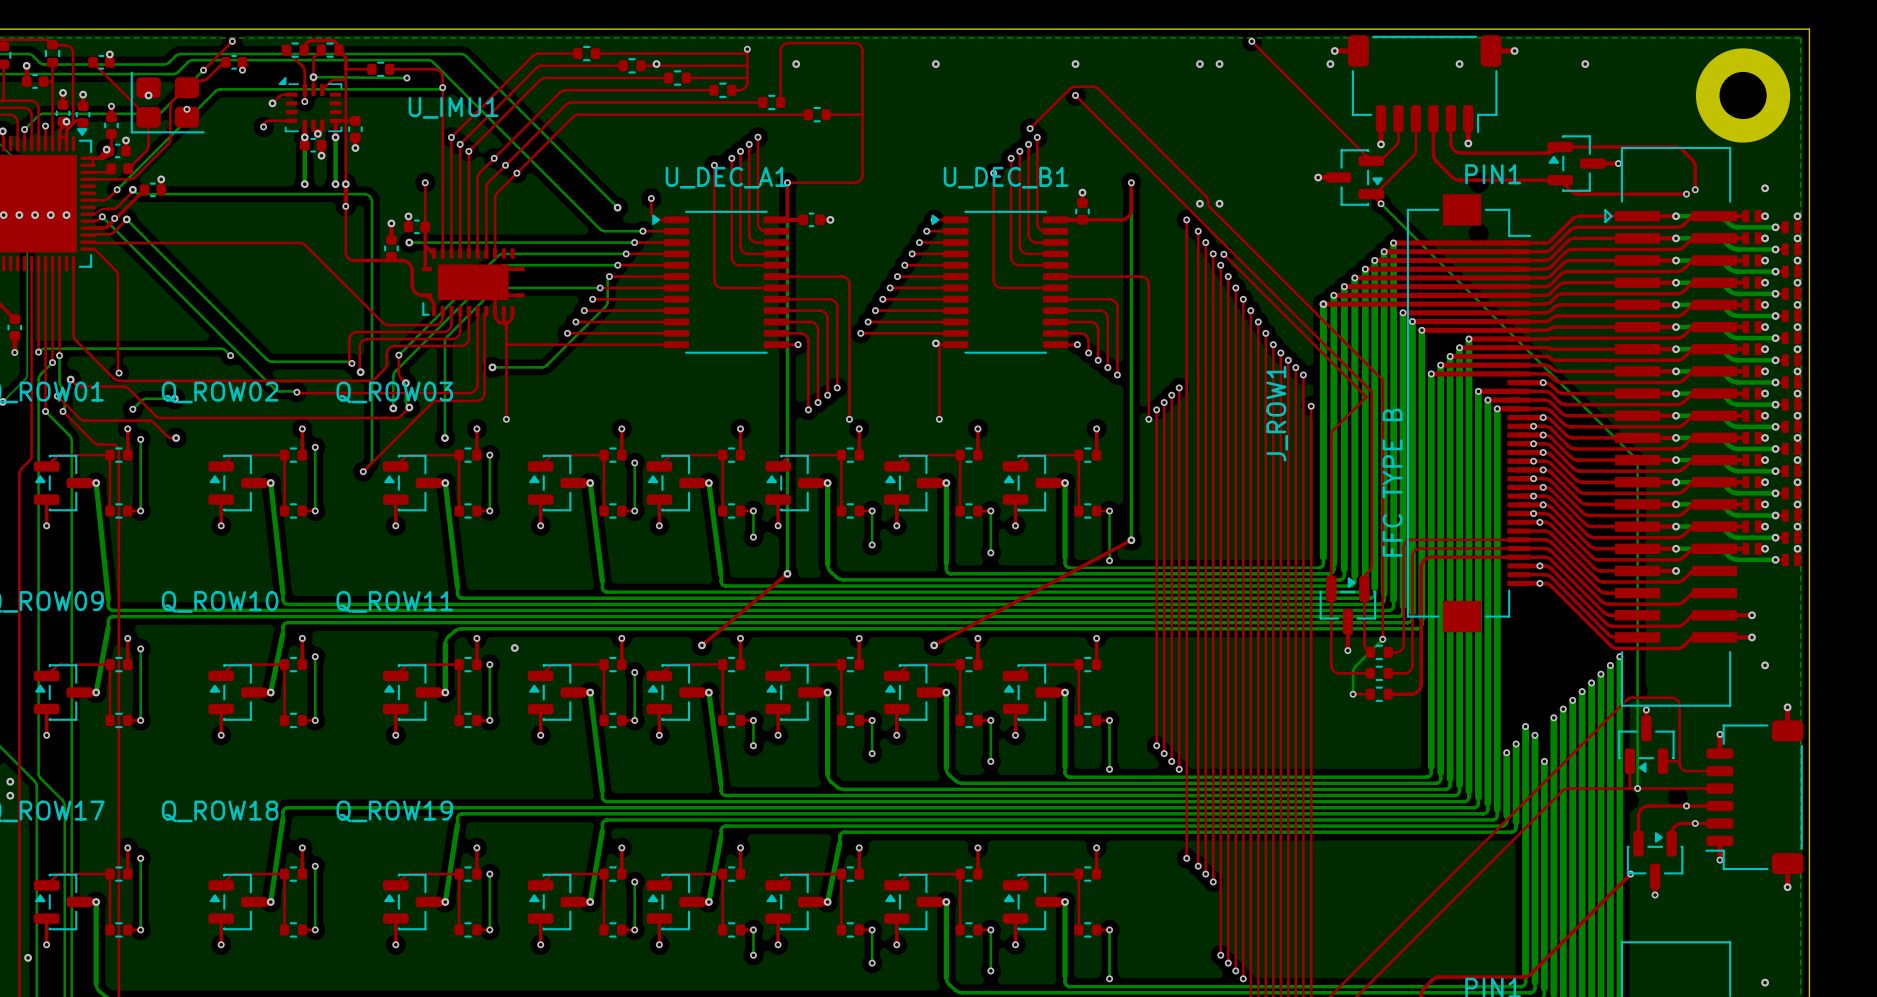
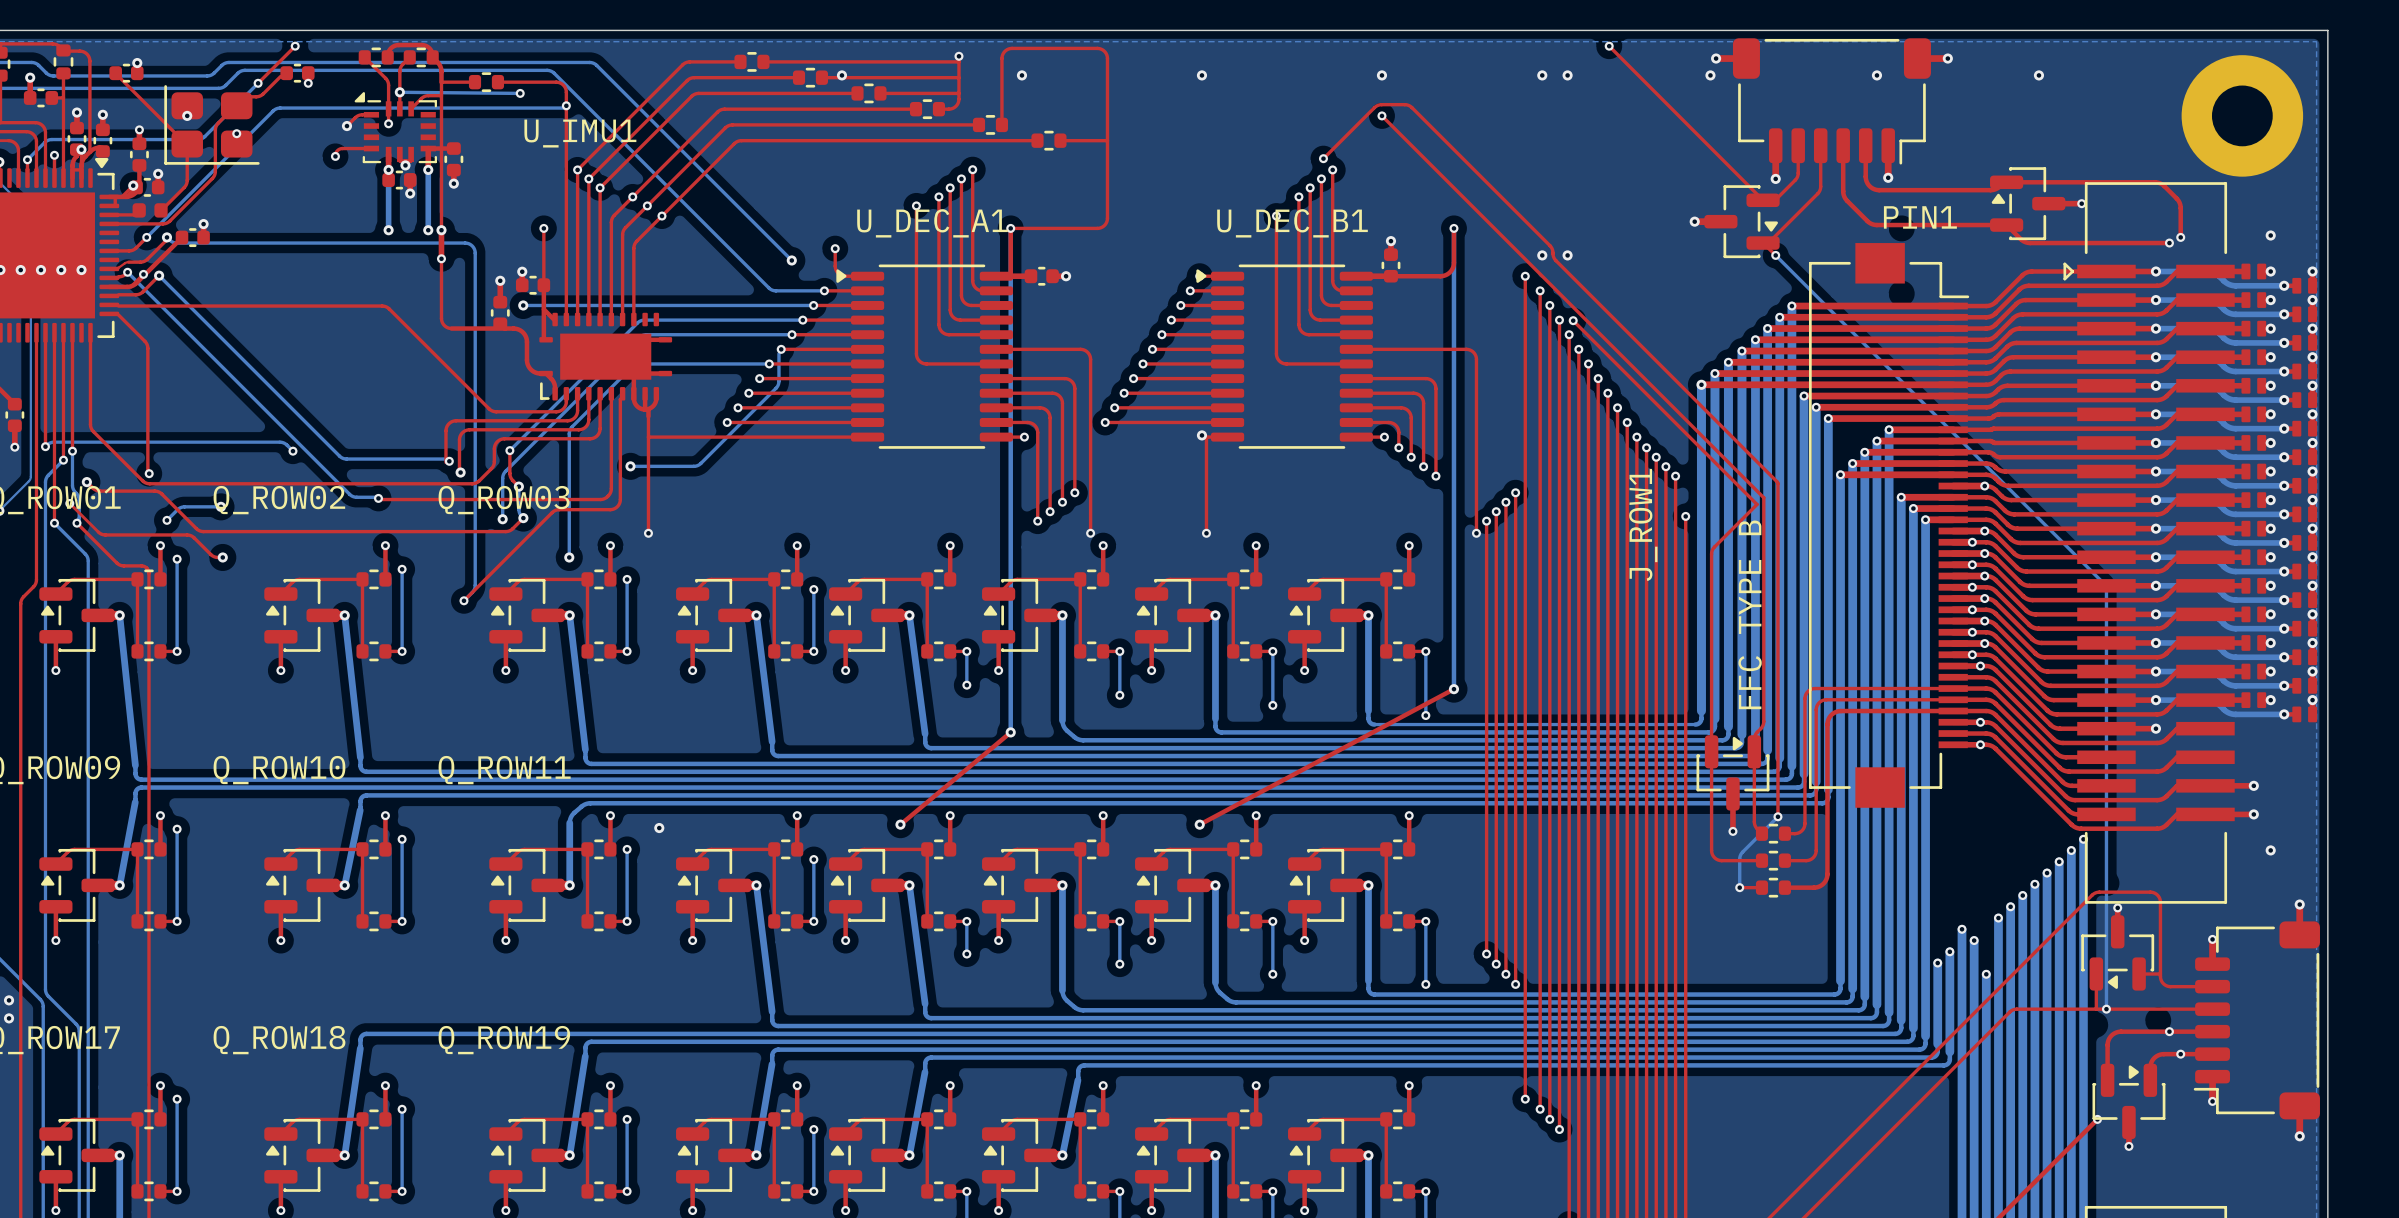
text position: FFC TYPE B (1392, 482) -> FFC TYPE B (1750, 614)

